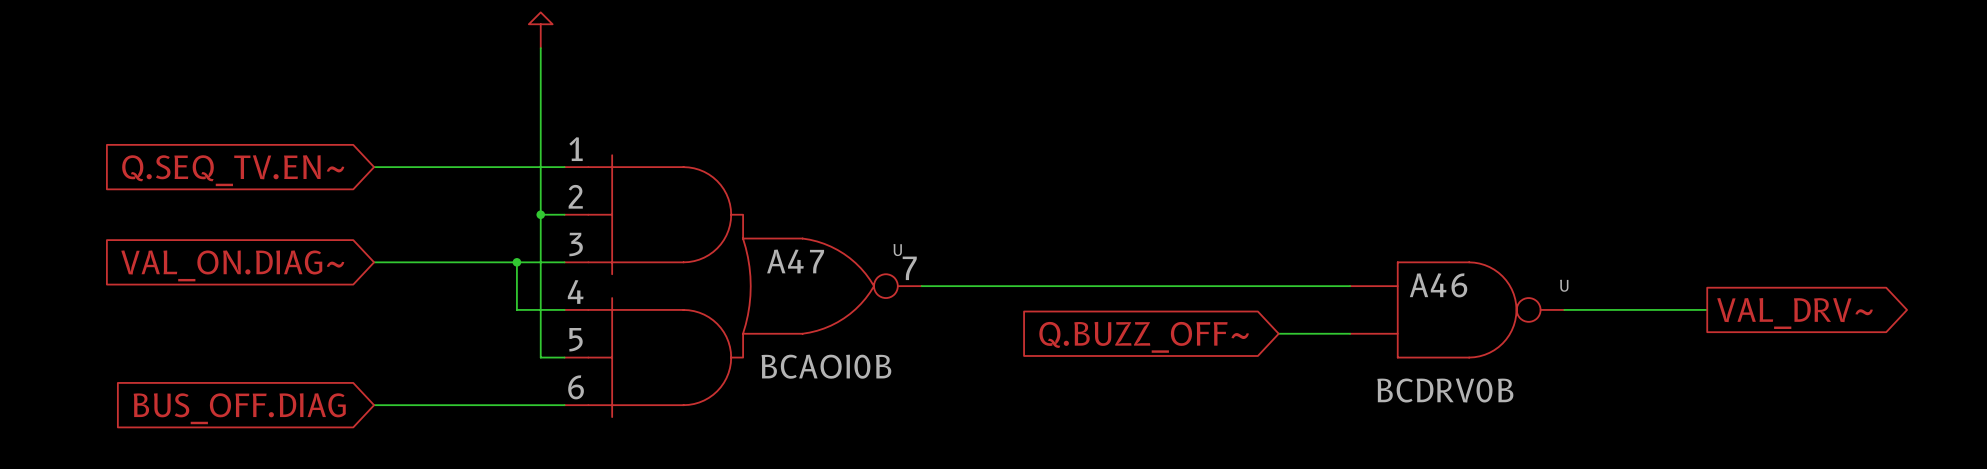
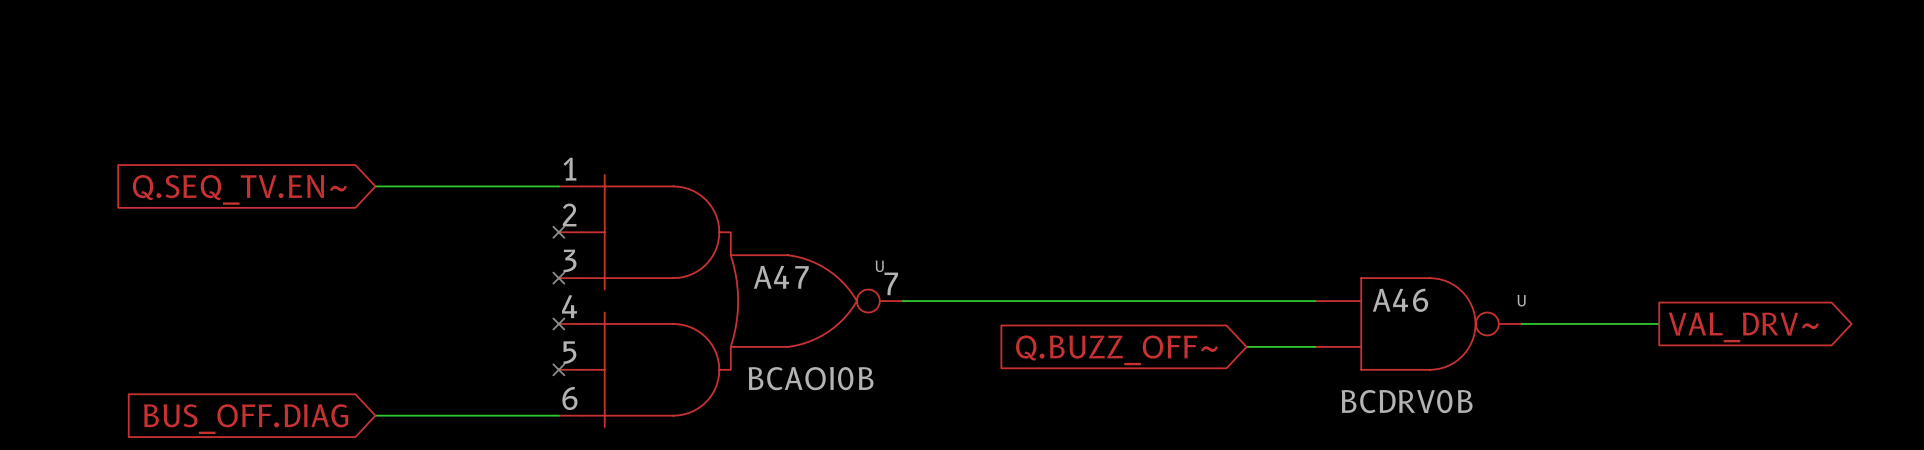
power symbol: (540, 29) -> none
wire: (540, 48) (540, 357) (564, 357) -> none
wire: (540, 214) (564, 214) -> none
junction: (540, 214) -> none
no-connect mark: none -> (558, 232)
wire: (374, 262) (564, 262) -> none
wire: (516, 262) (516, 309) (564, 309) -> none
junction: (516, 262) -> none
no-connect mark: none -> (558, 278)
global label: VAL_ON.DIAG~ (232, 265) -> none
no-connect mark: none -> (558, 323)
no-connect mark: none -> (558, 369)

